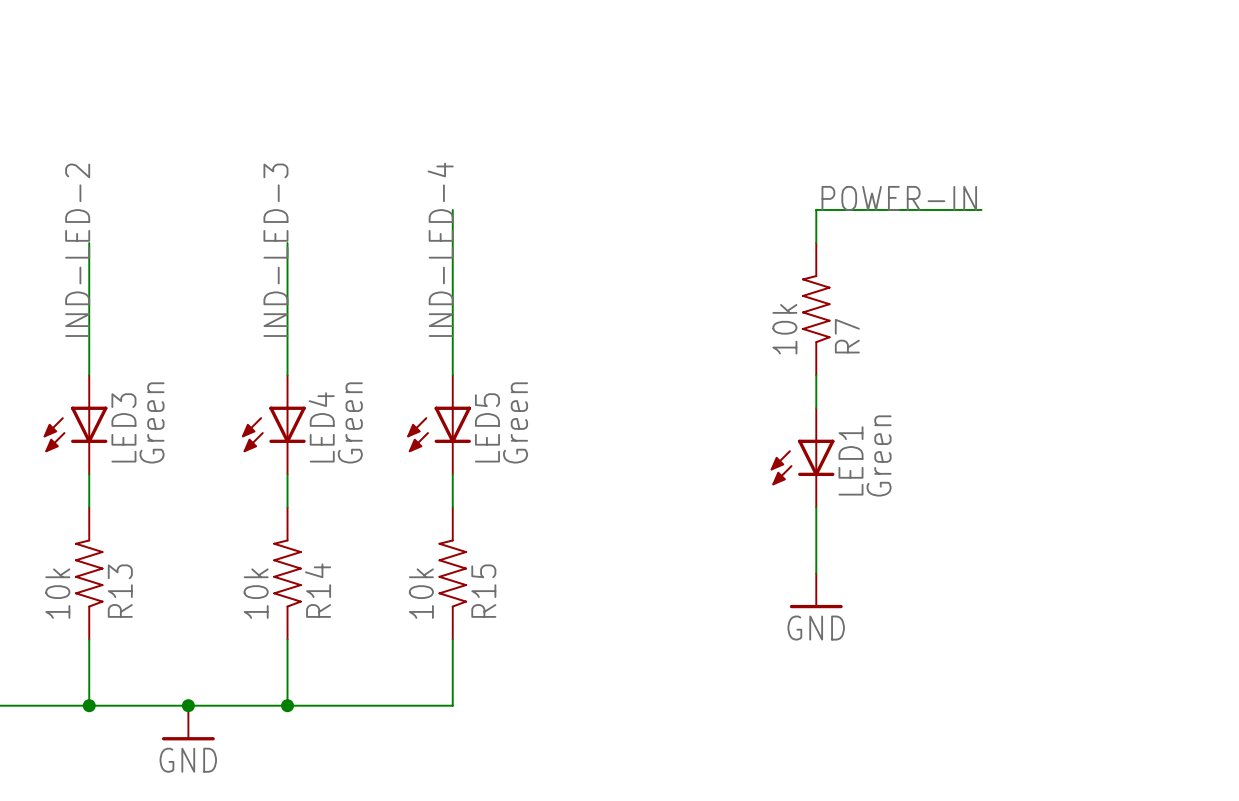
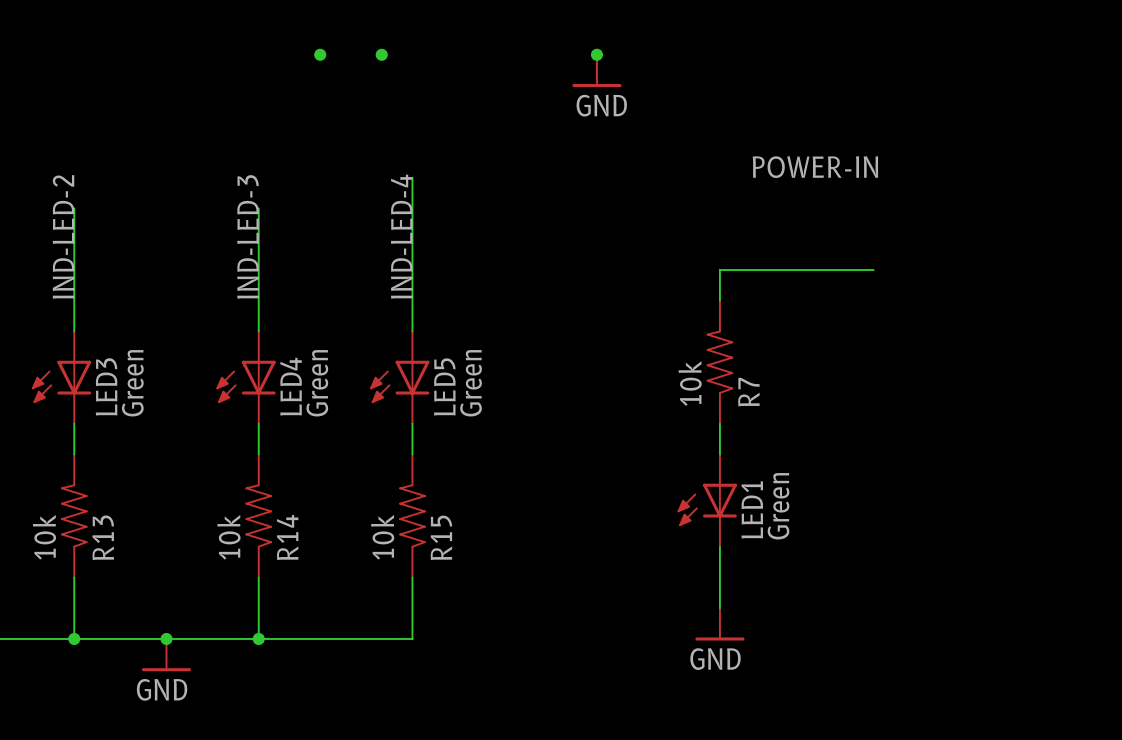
junction: none -> (320, 54)
junction: none -> (381, 54)
junction: none -> (596, 54)
power symbol: none -> GND (596, 70)
wire: (981, 209) (816, 209) (816, 243) -> (873, 270) (719, 270) (719, 300)
R7 position: (816, 309) -> (719, 362)
wire: (816, 375) (816, 408) -> (719, 423) (719, 454)
LED1 position: (802, 457) -> (707, 500)
wire: (816, 507) (816, 573) -> (719, 546) (719, 608)
power symbol position: GND (816, 590) -> GND (719, 624)

